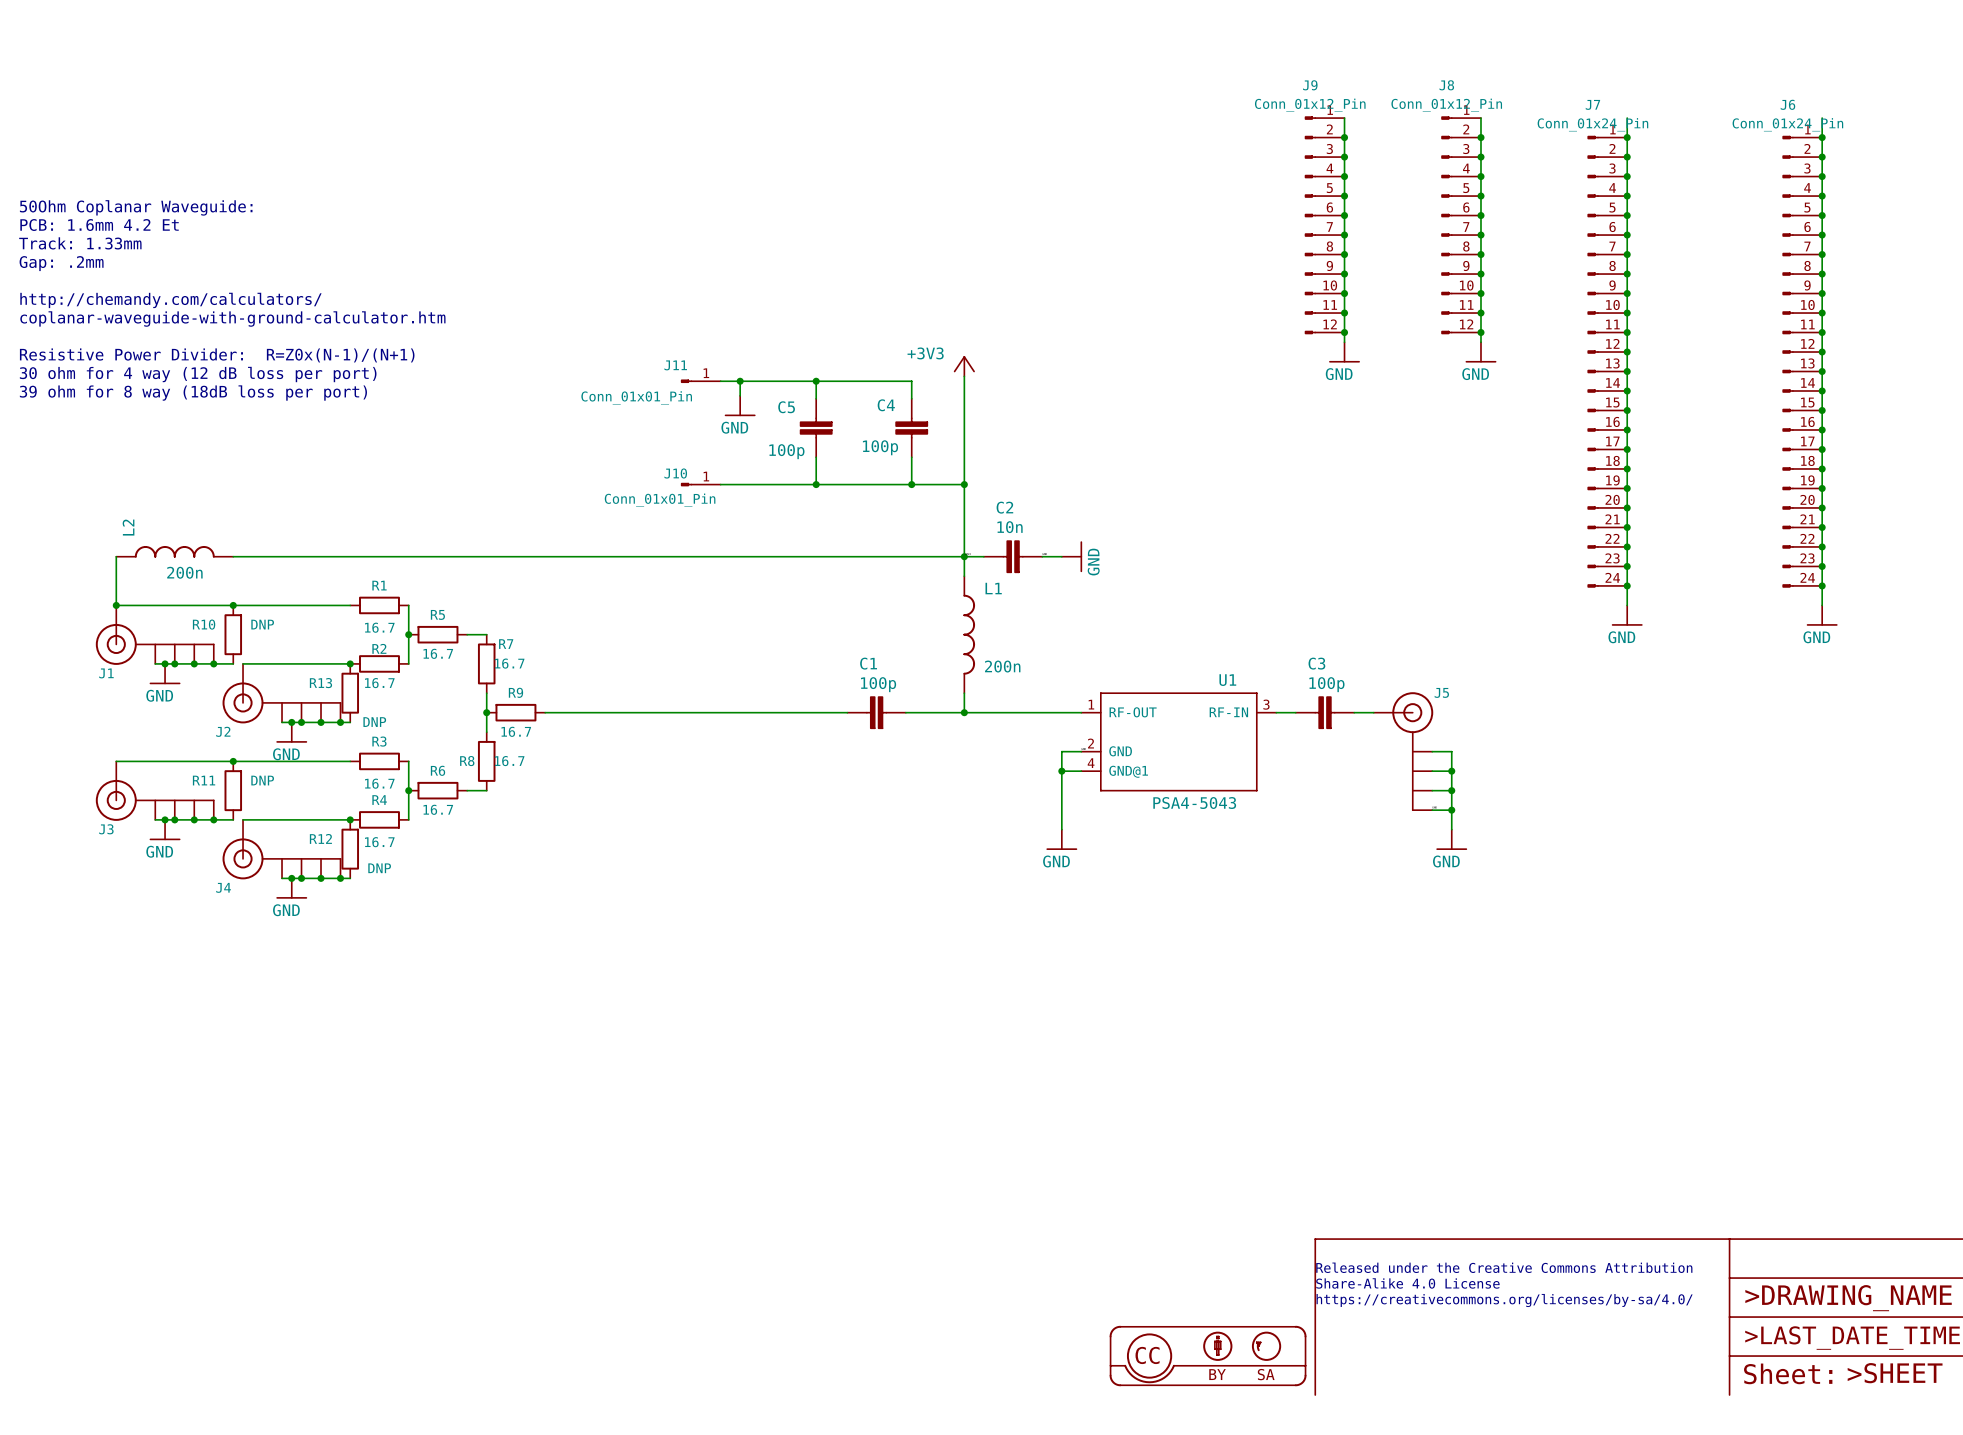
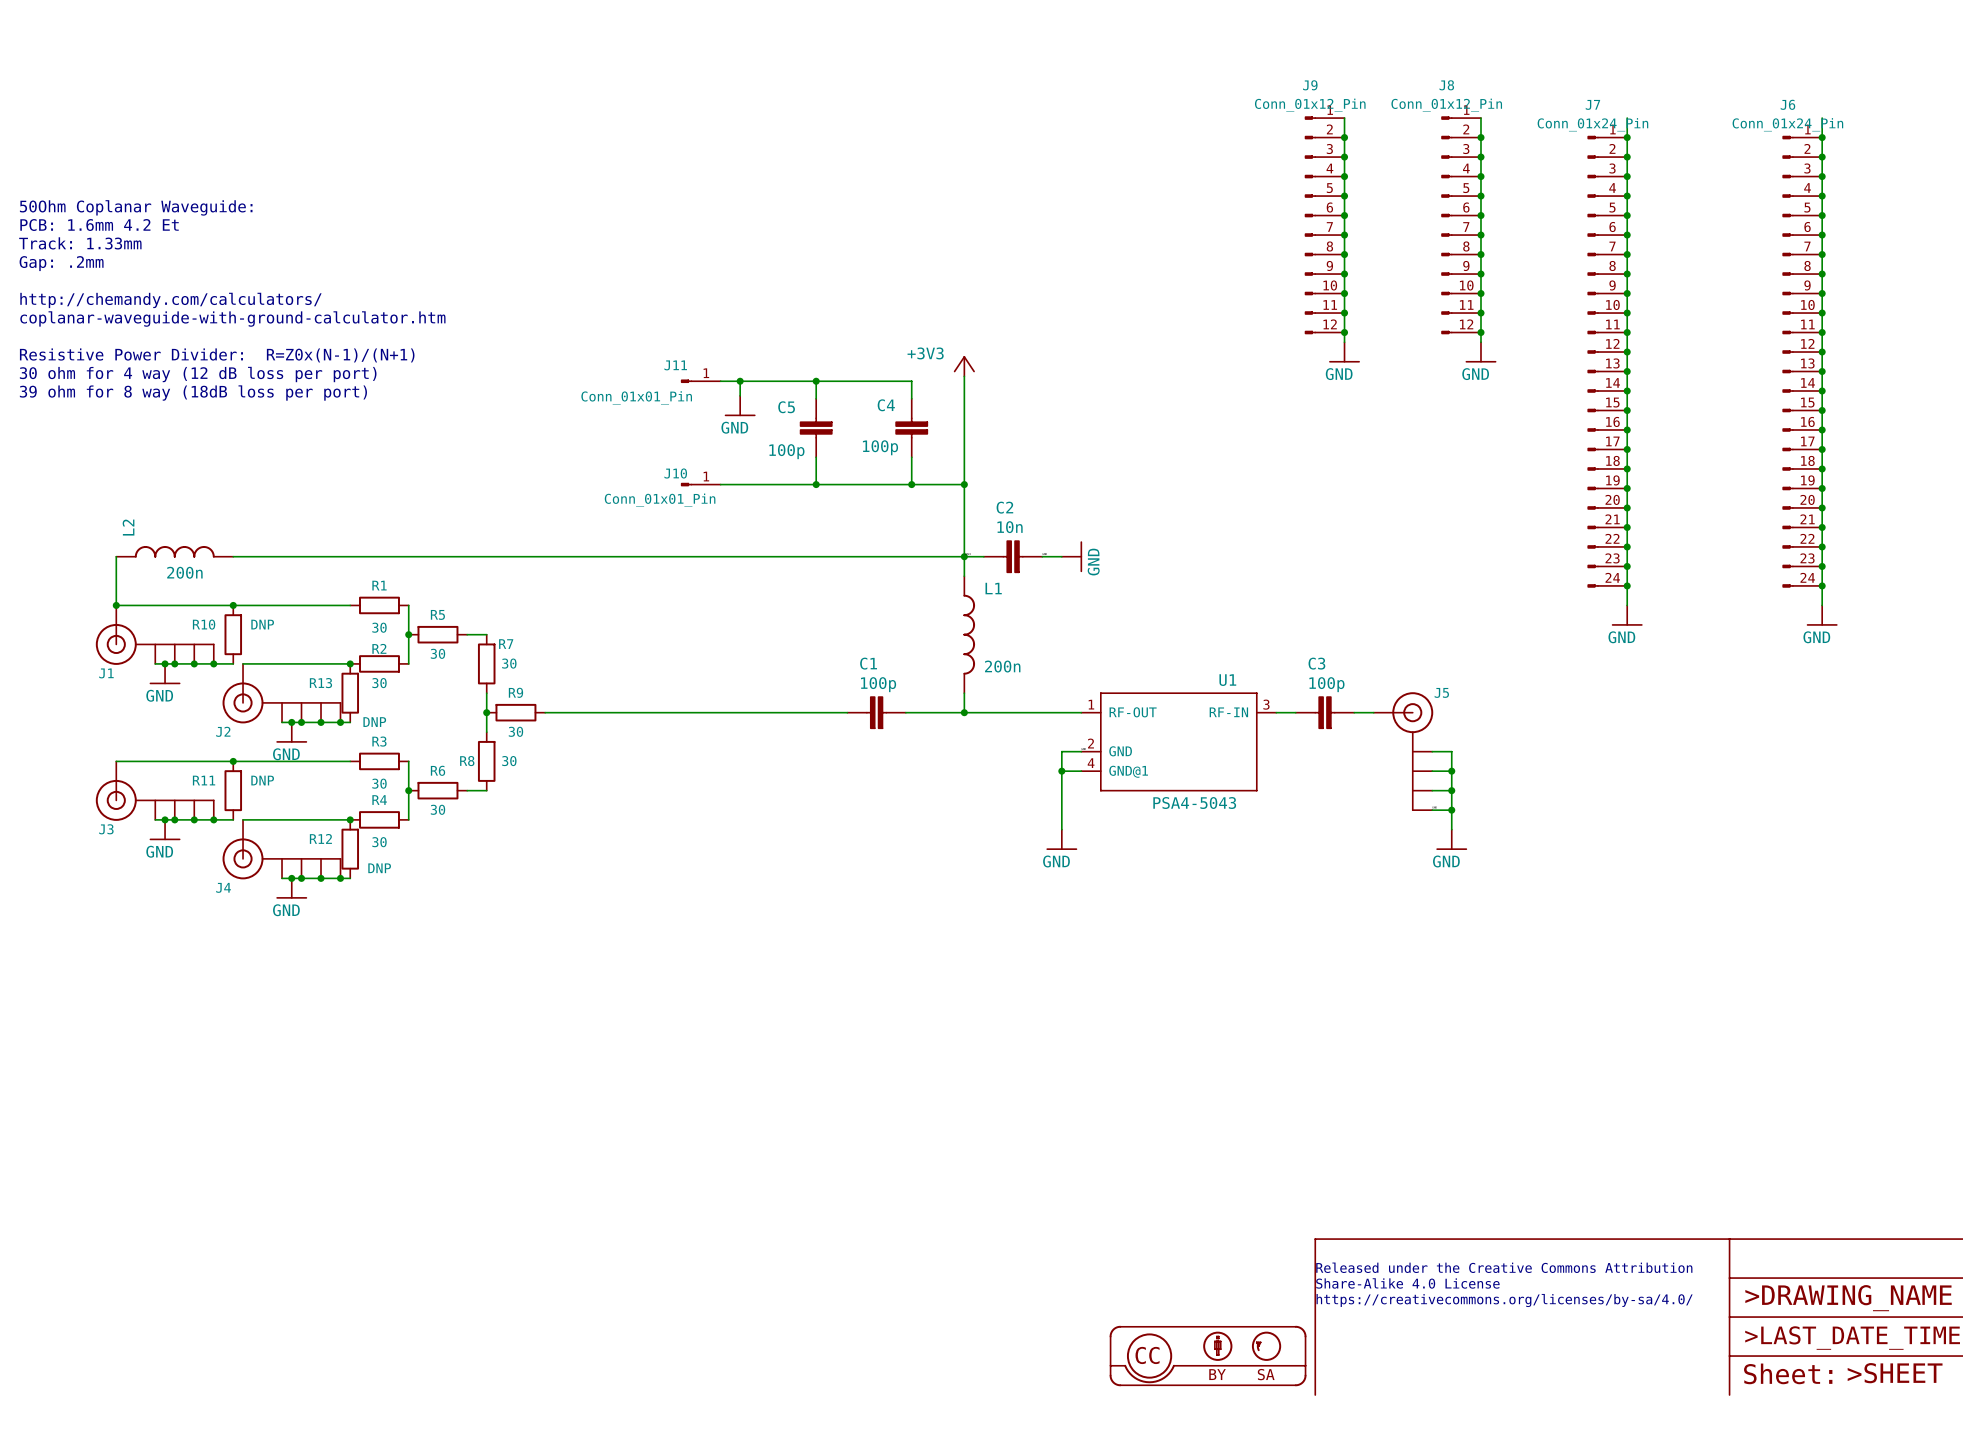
R1 value: 16.7 (379, 627) -> 30 (379, 627)
R5 value: 16.7 (438, 653) -> 30 (437, 653)
R7 value: 16.7 (509, 663) -> 30 (509, 663)
R2 value: 16.7 (379, 683) -> 30 (379, 683)
R9 value: 16.7 (516, 731) -> 30 (515, 731)
R8 value: 16.7 (509, 761) -> 30 (509, 761)
R3 value: 16.7 (379, 783) -> 30 (379, 783)
R6 value: 16.7 (438, 809) -> 30 (437, 809)
R4 value: 16.7 (379, 842) -> 30 (379, 842)

